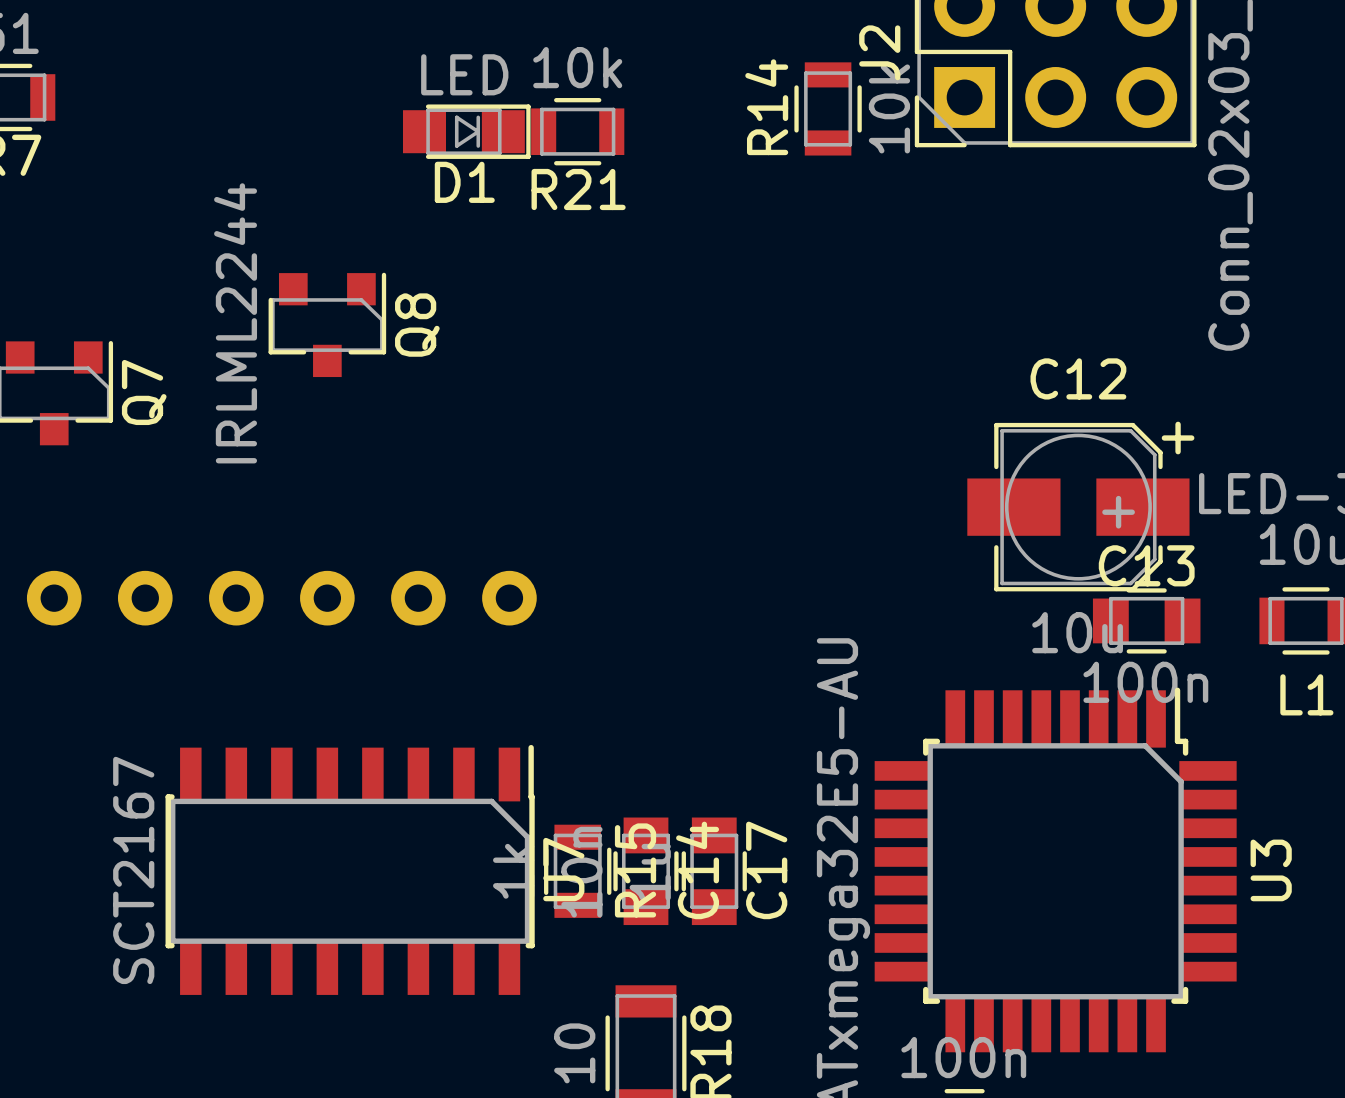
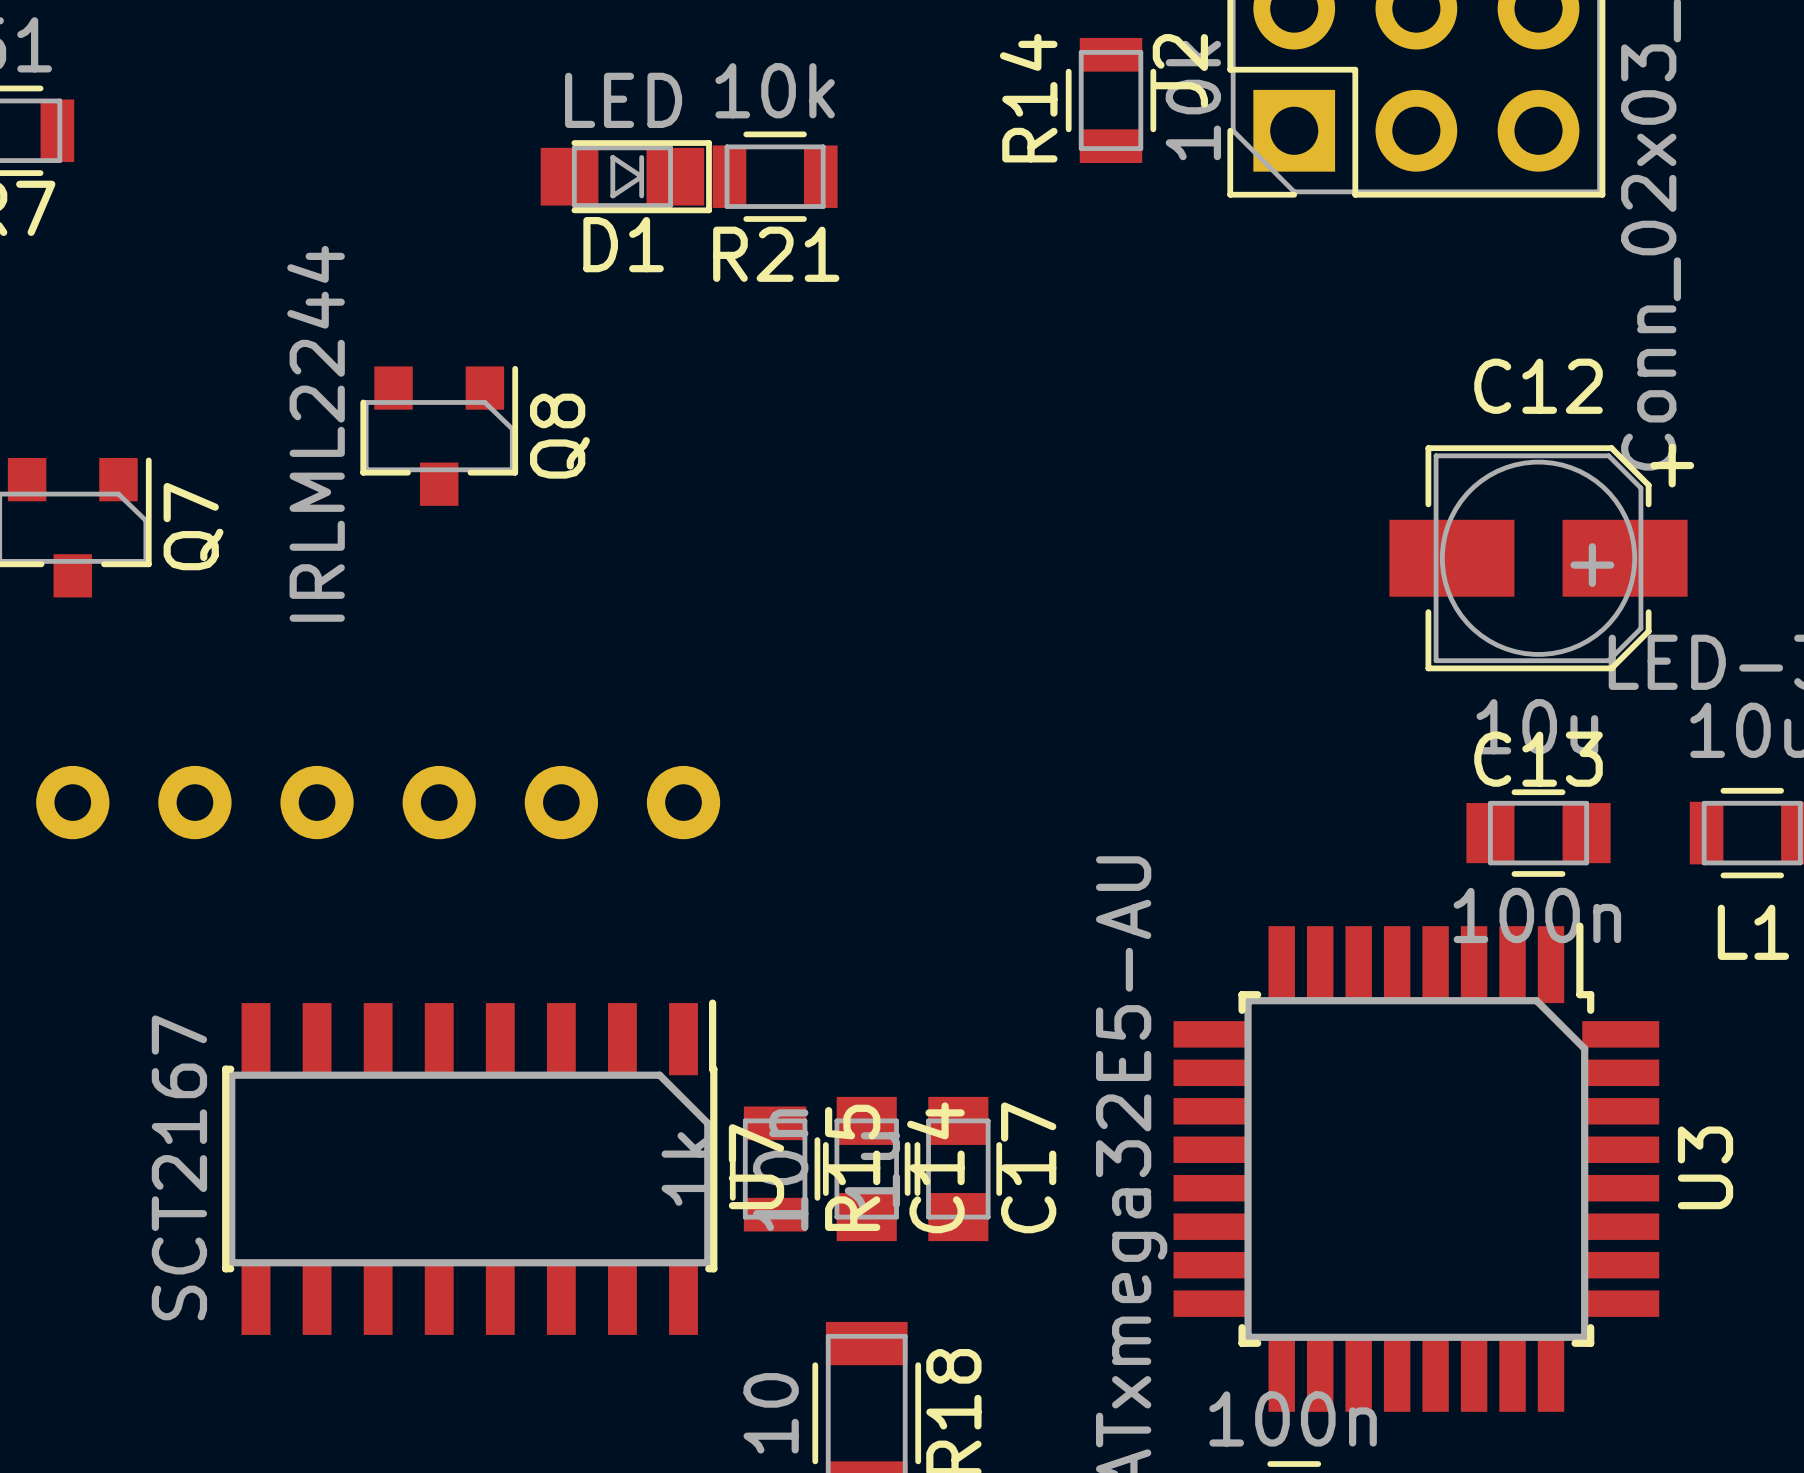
R14 position: (828, 108) -> (1111, 100)
C12 position: (1078, 507) -> (1538, 558)

